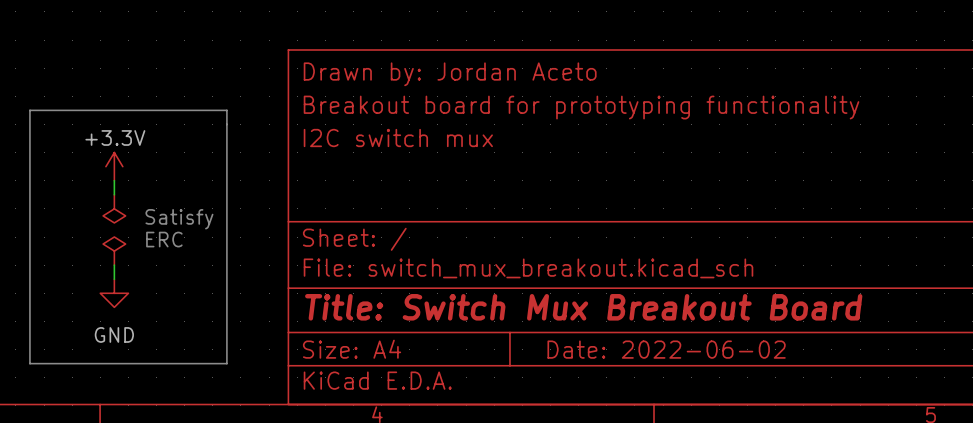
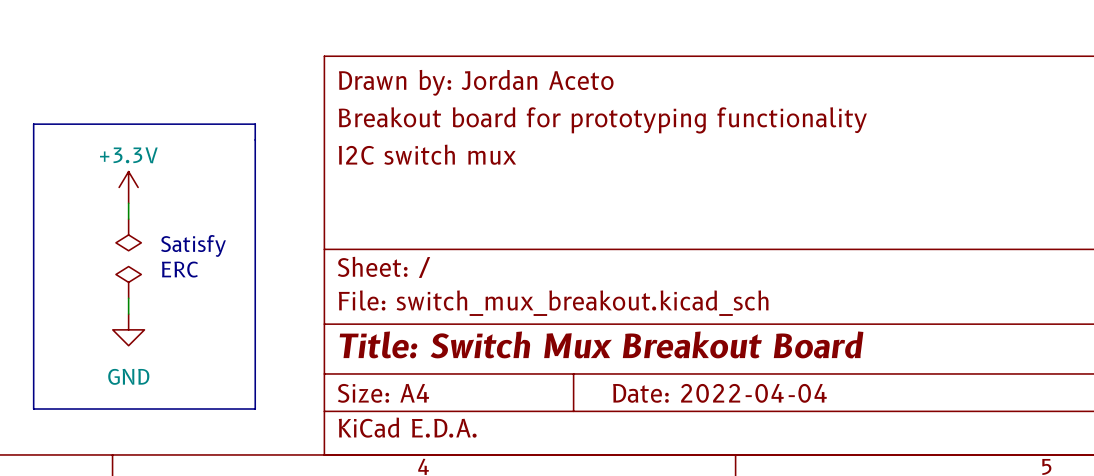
title block: Date: 2022-06-02 (666, 349) -> Date: 2022-04-04 (719, 393)

